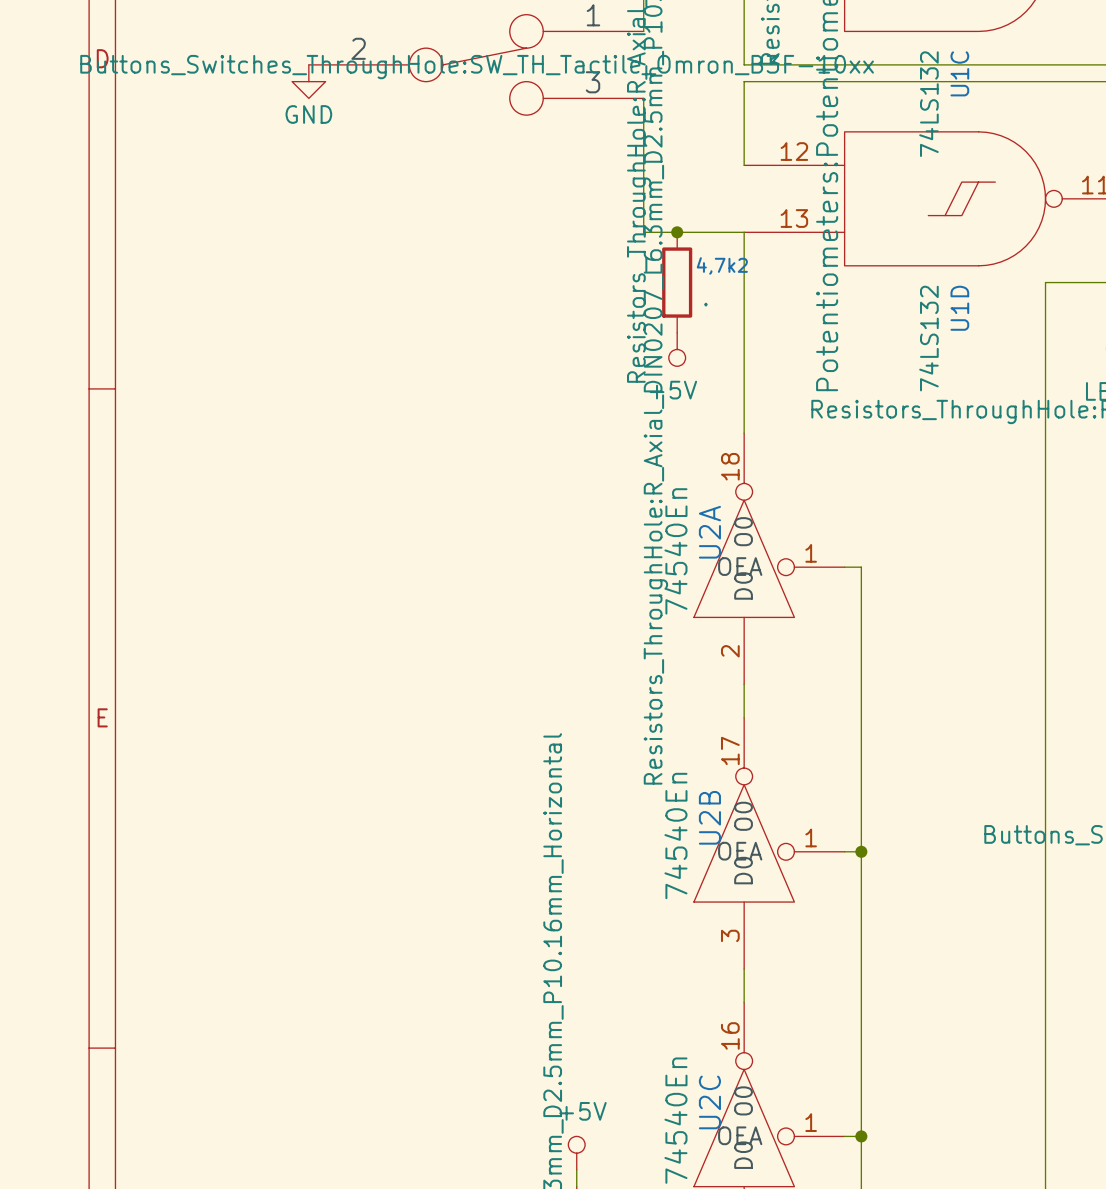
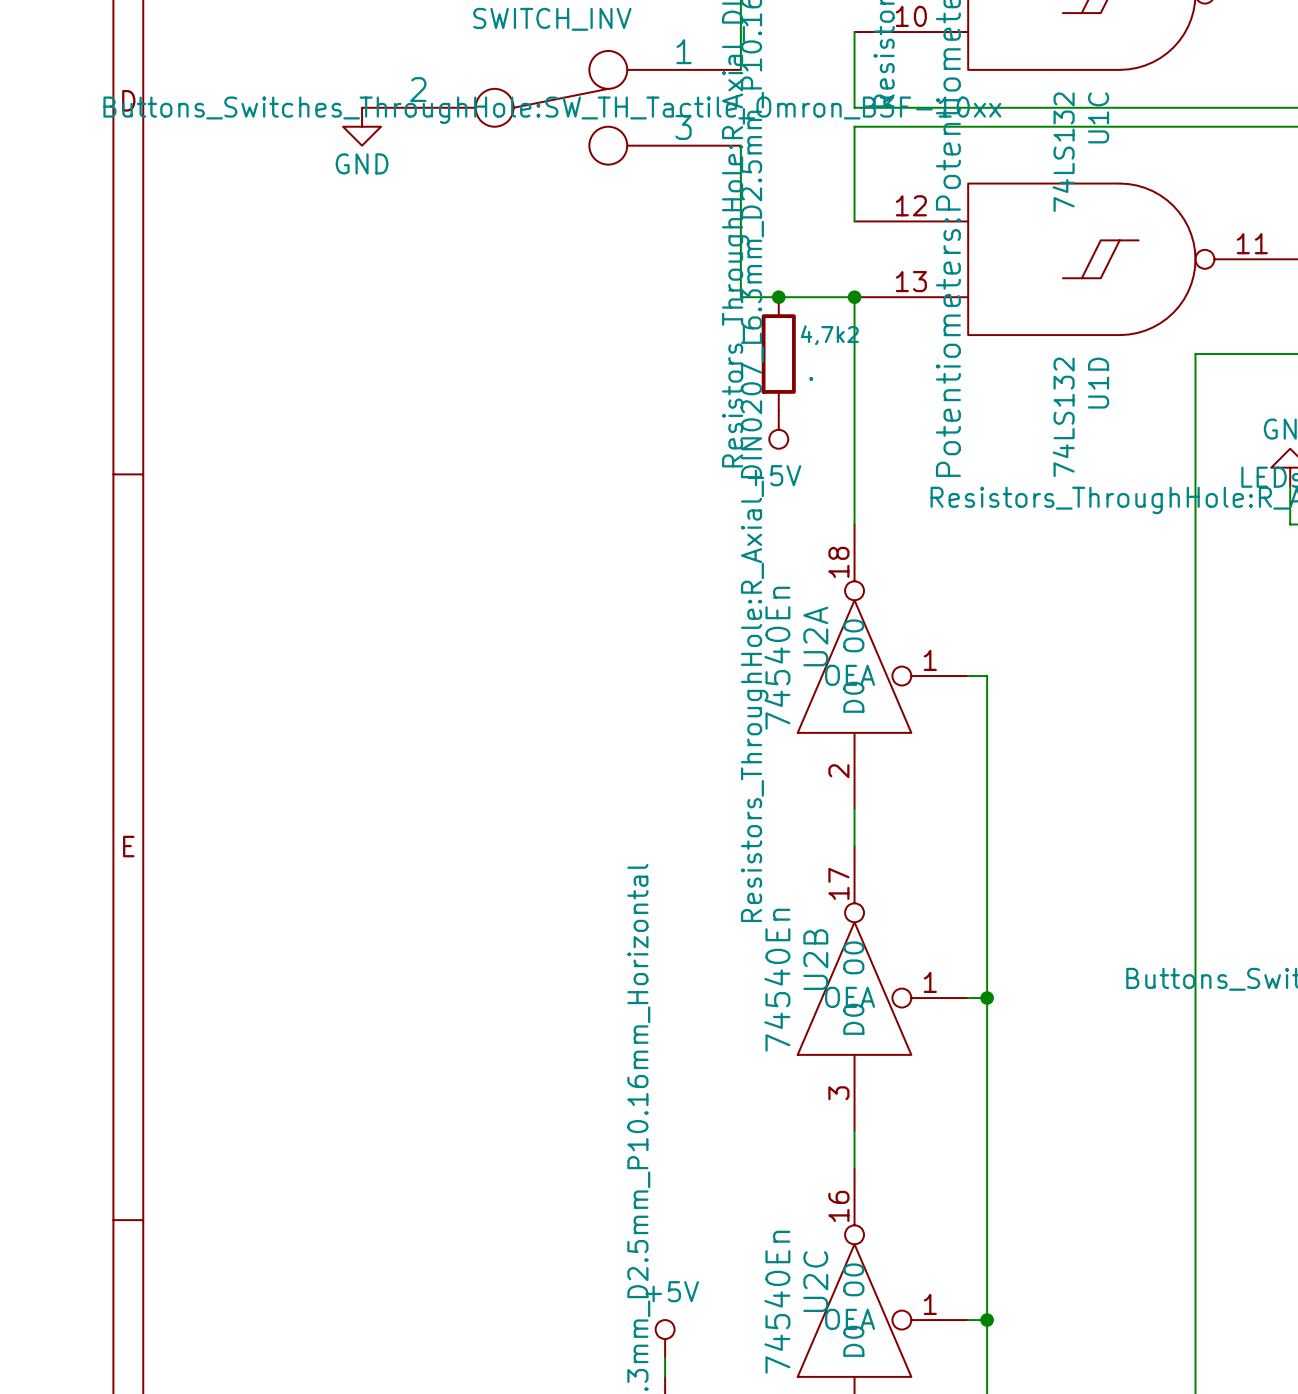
junction: none -> (854, 297)

